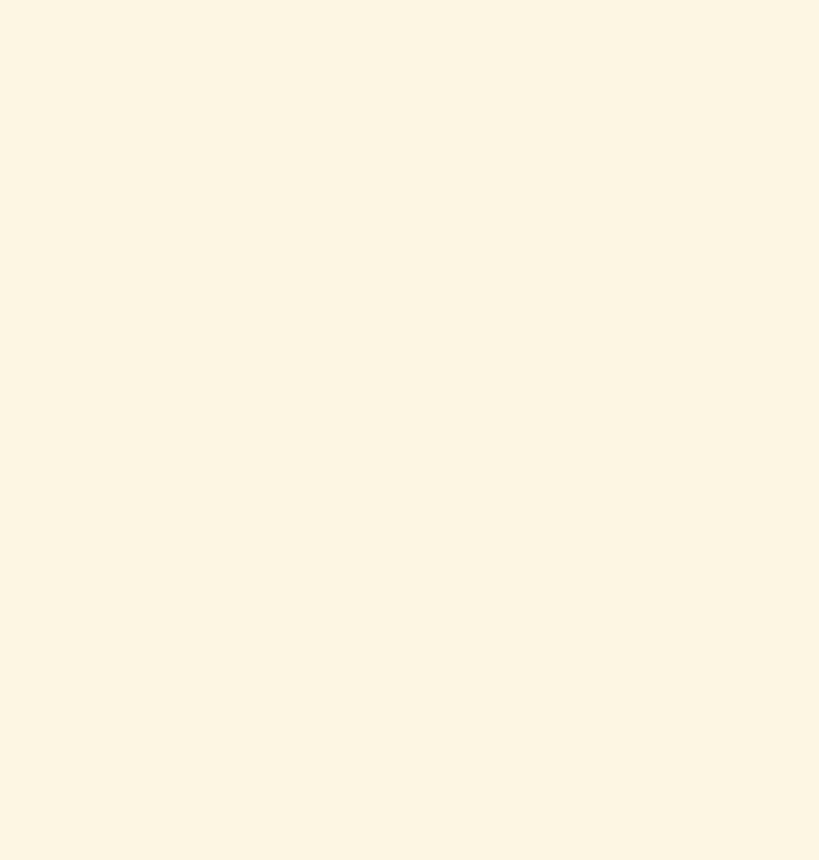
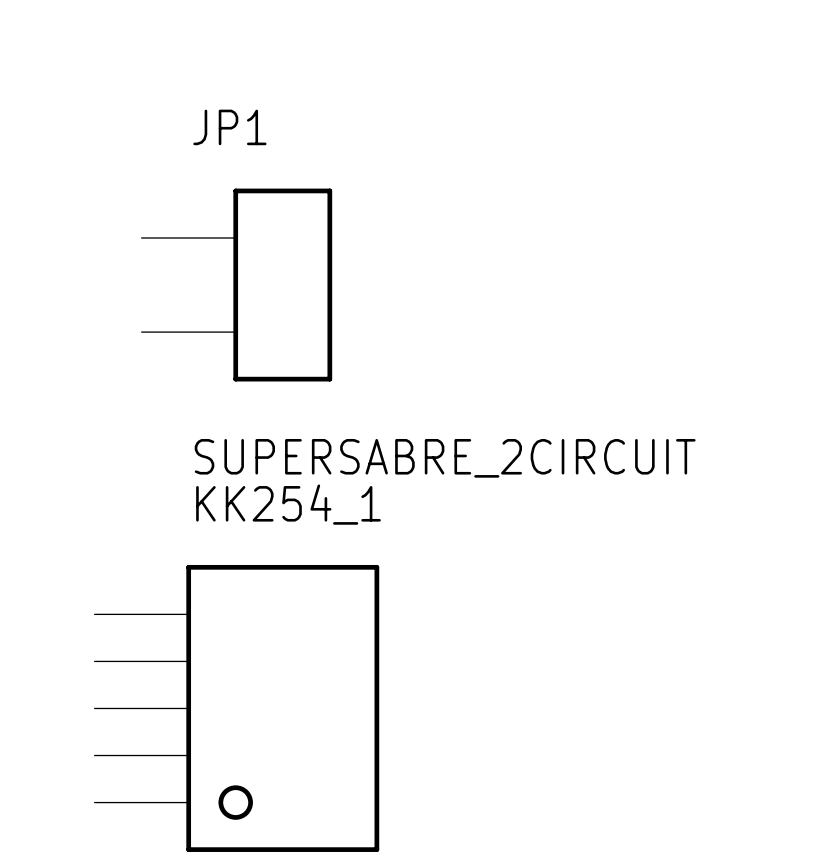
JP1: none -> SUPERSABRE_2CIRCUIT (236, 285)
KK254_1: none -> (236, 708)

